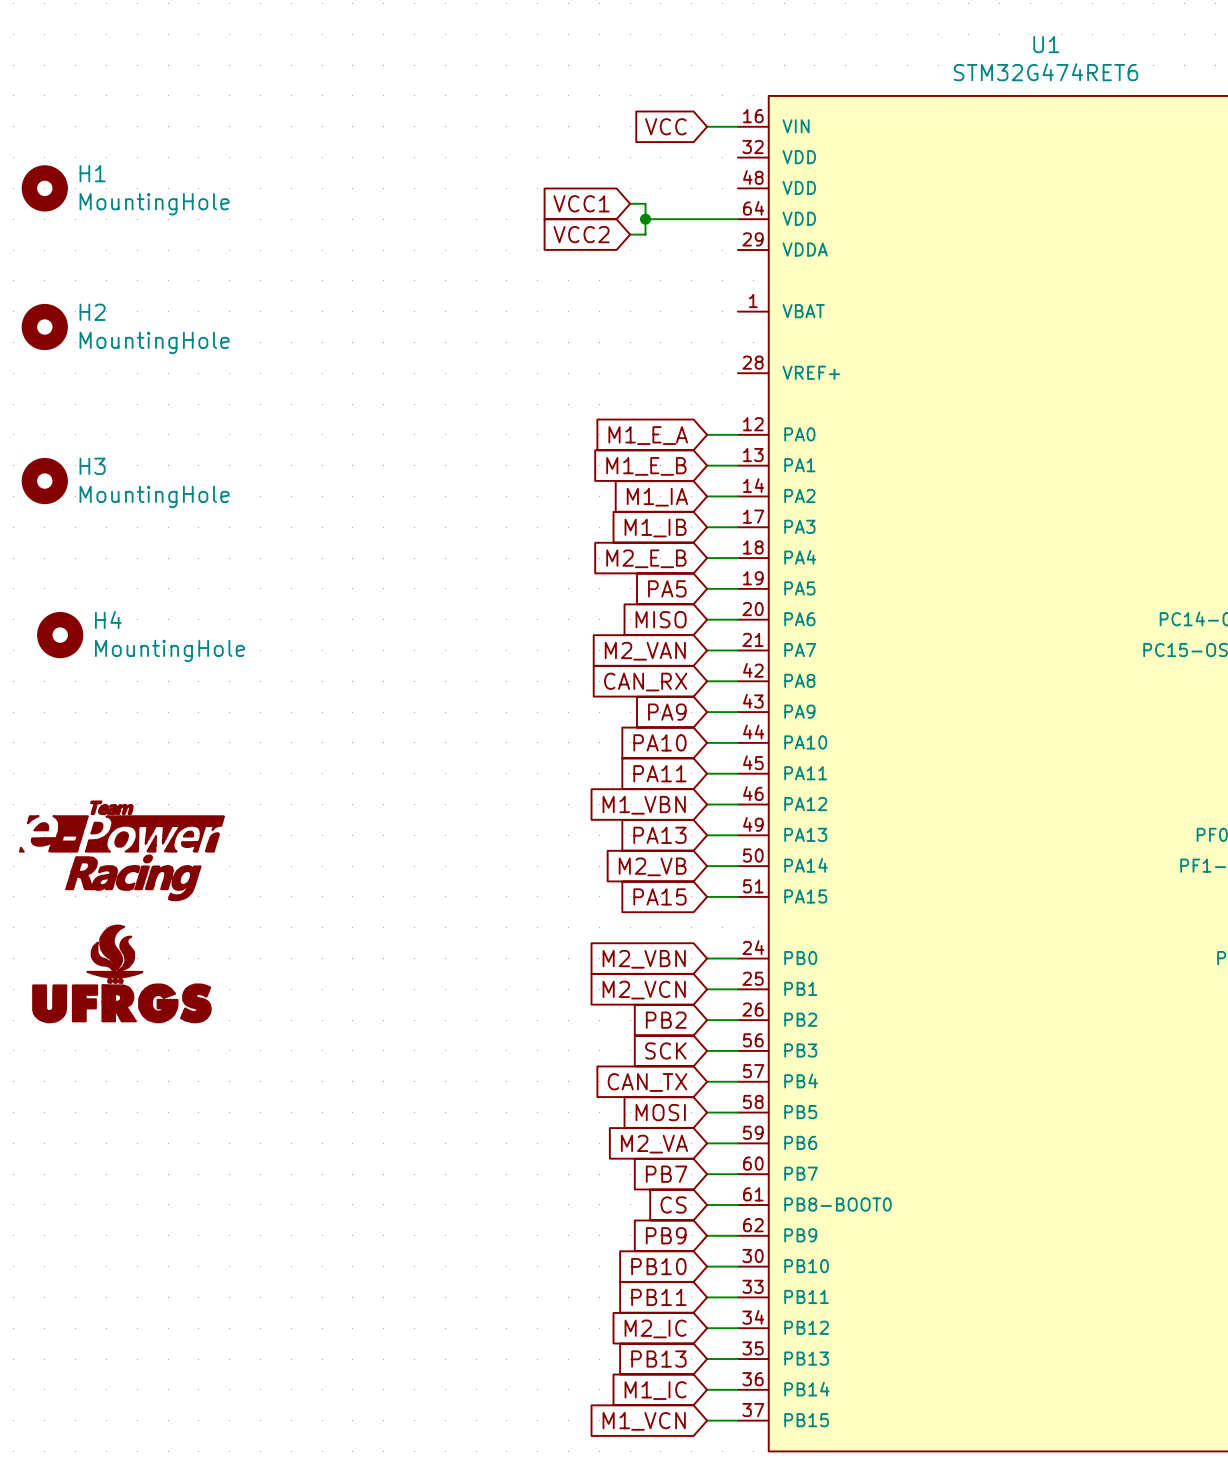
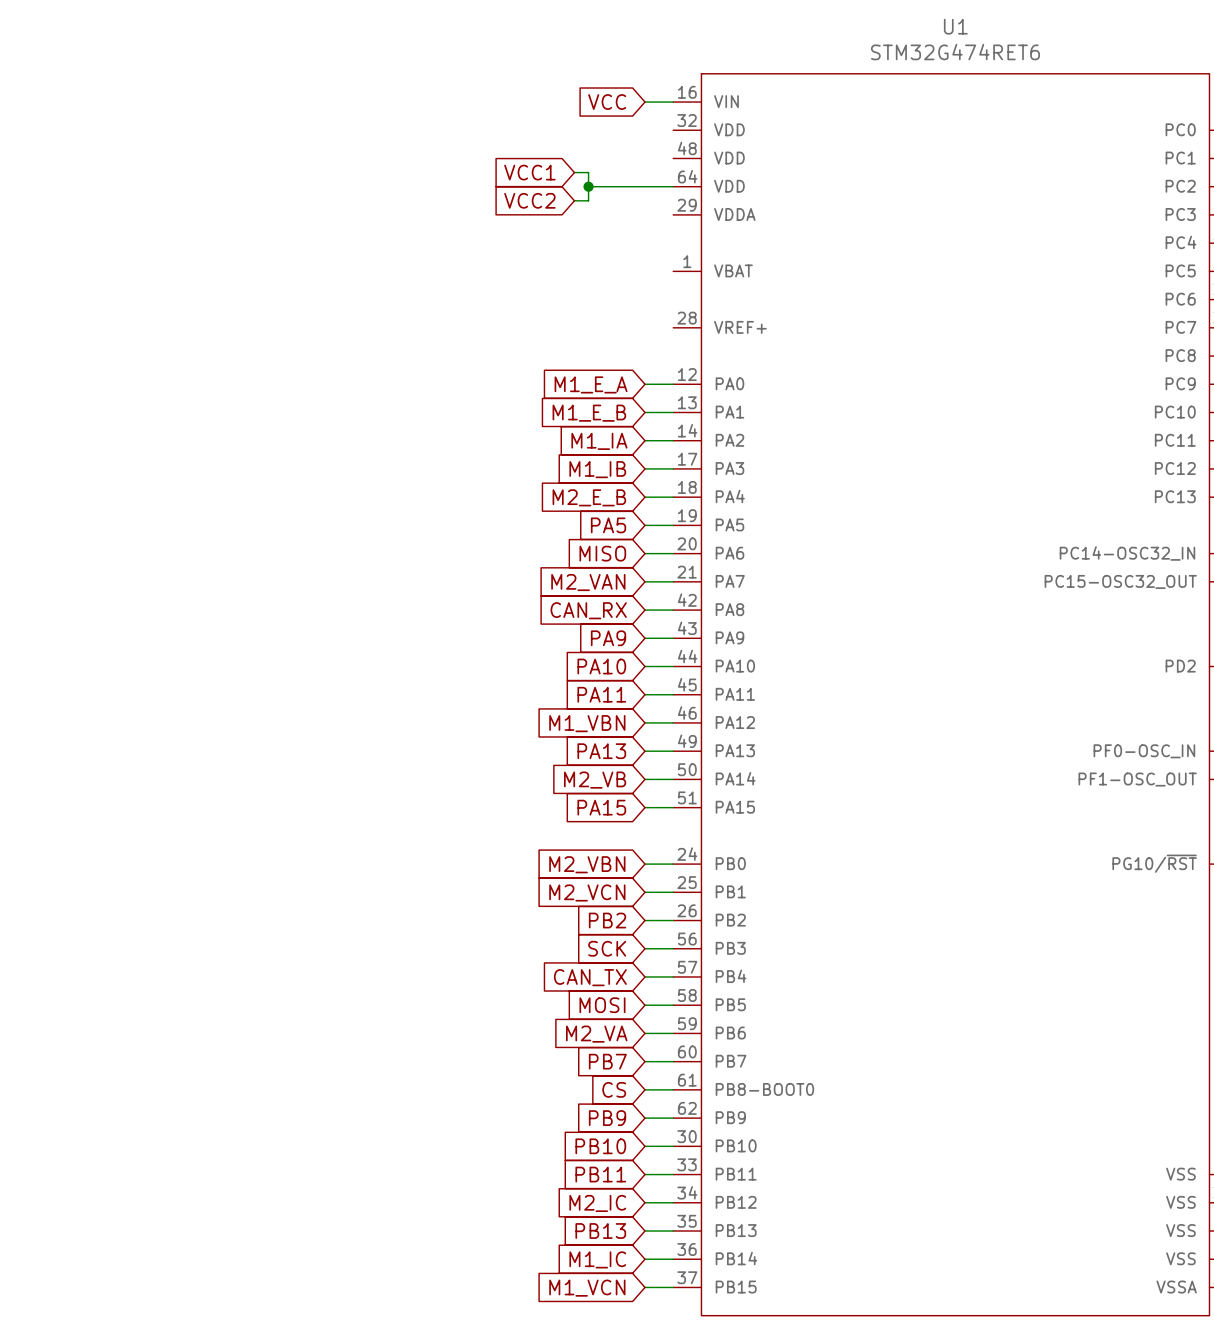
H1: MountingHole (44, 188) -> none
H2: MountingHole (44, 327) -> none
H3: MountingHole (44, 481) -> none
H4: MountingHole (60, 635) -> none
part: (121, 850) -> none
part: (121, 973) -> none

